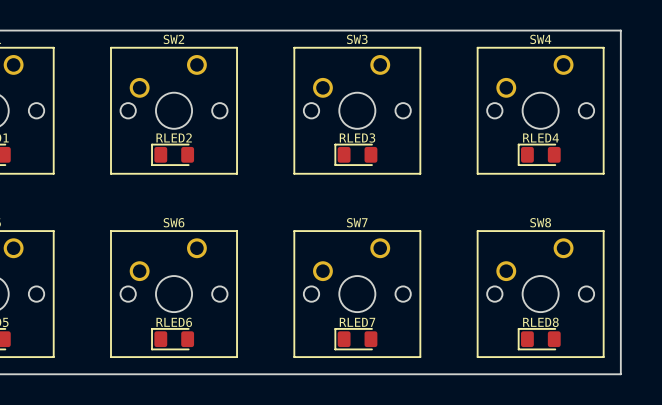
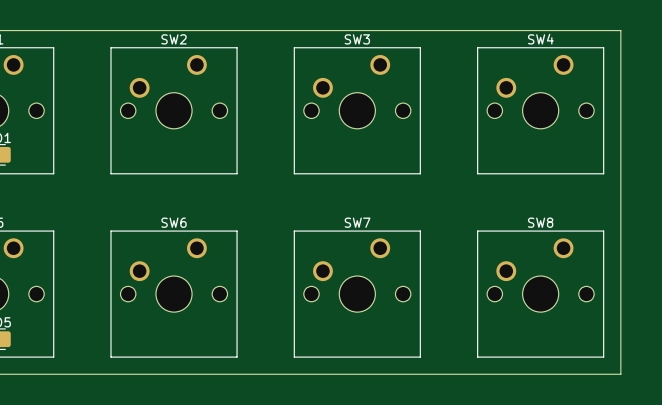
RLED2: (172, 154) -> none
RLED3: (356, 154) -> none
RLED4: (539, 154) -> none
RLED6: (172, 339) -> none
RLED7: (356, 339) -> none
RLED8: (539, 339) -> none

